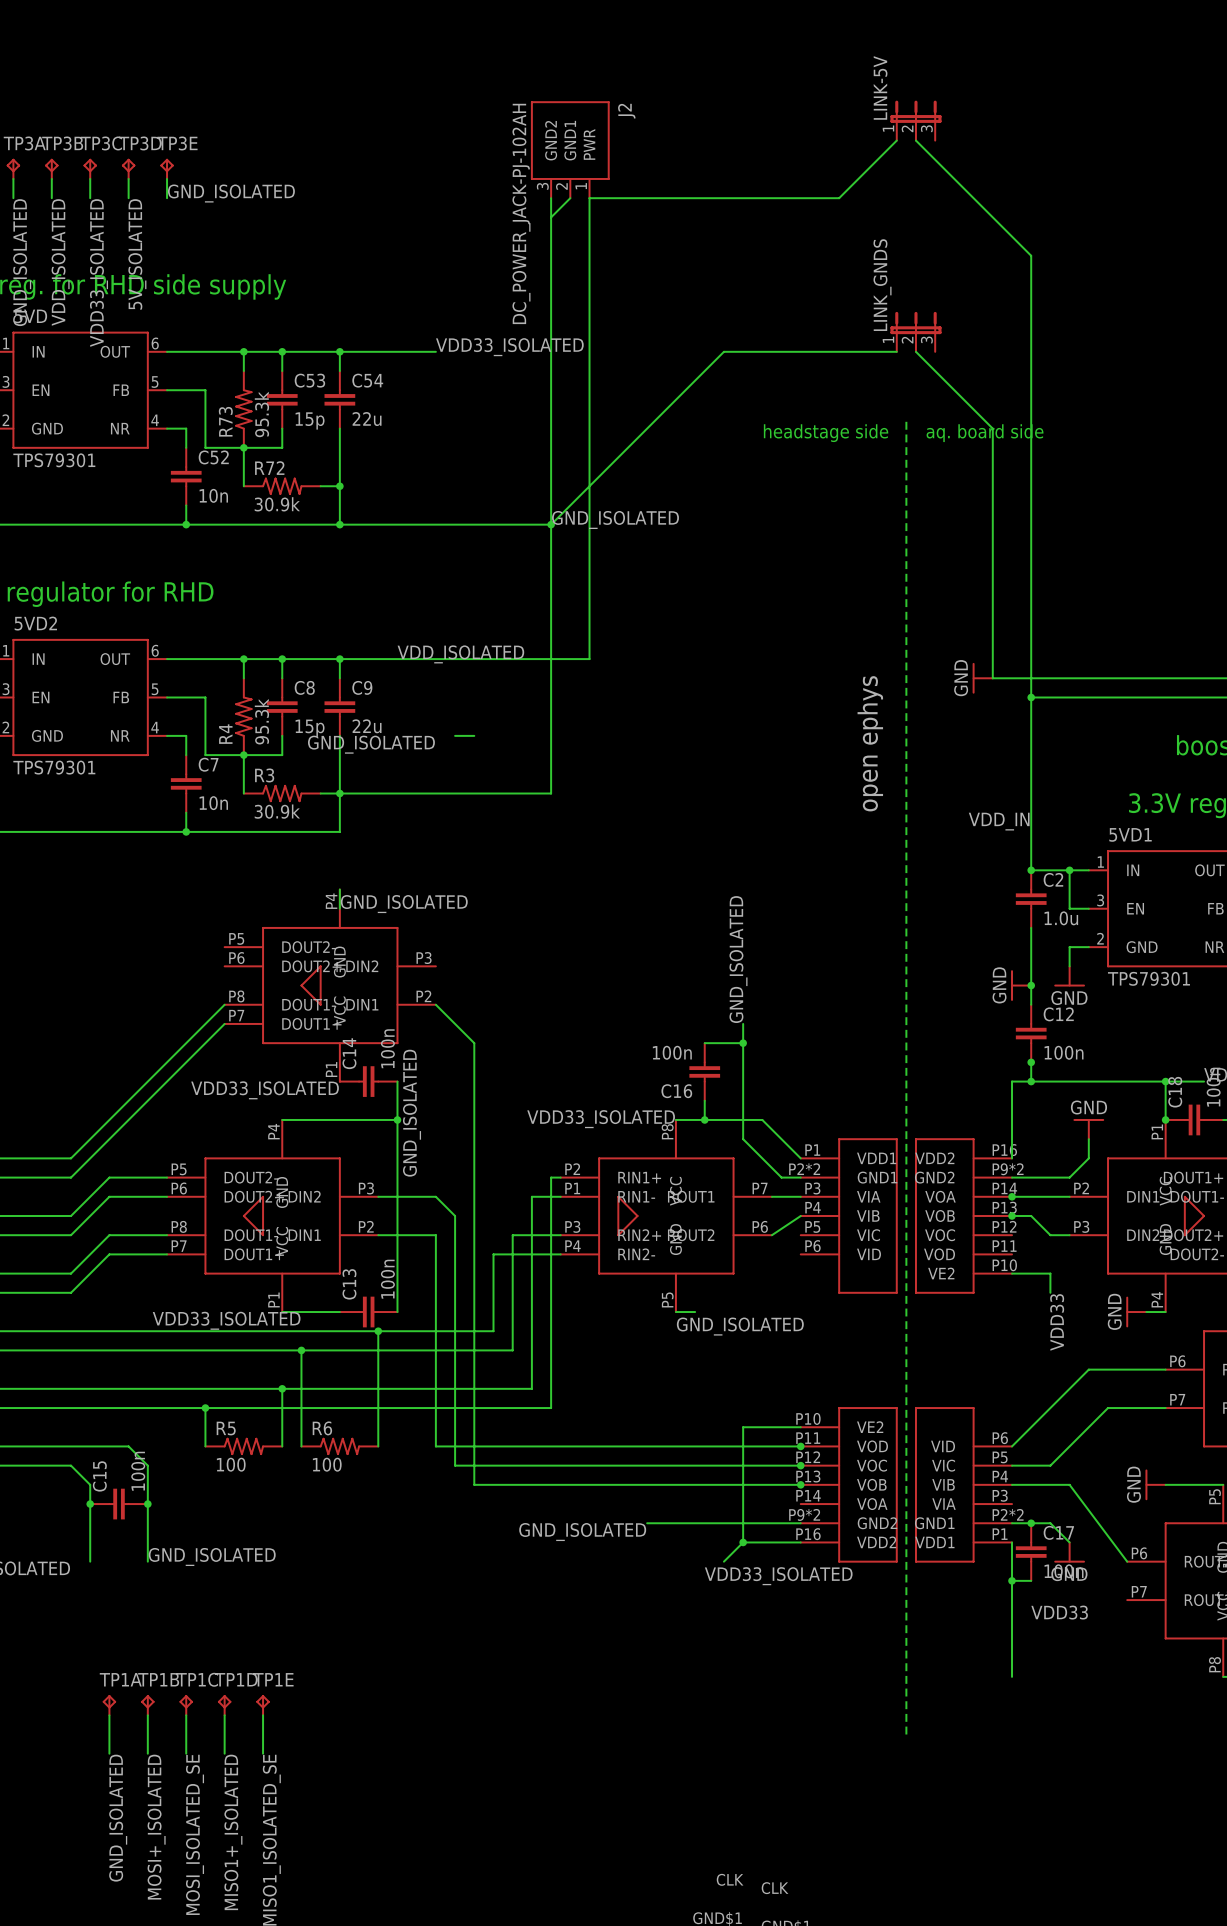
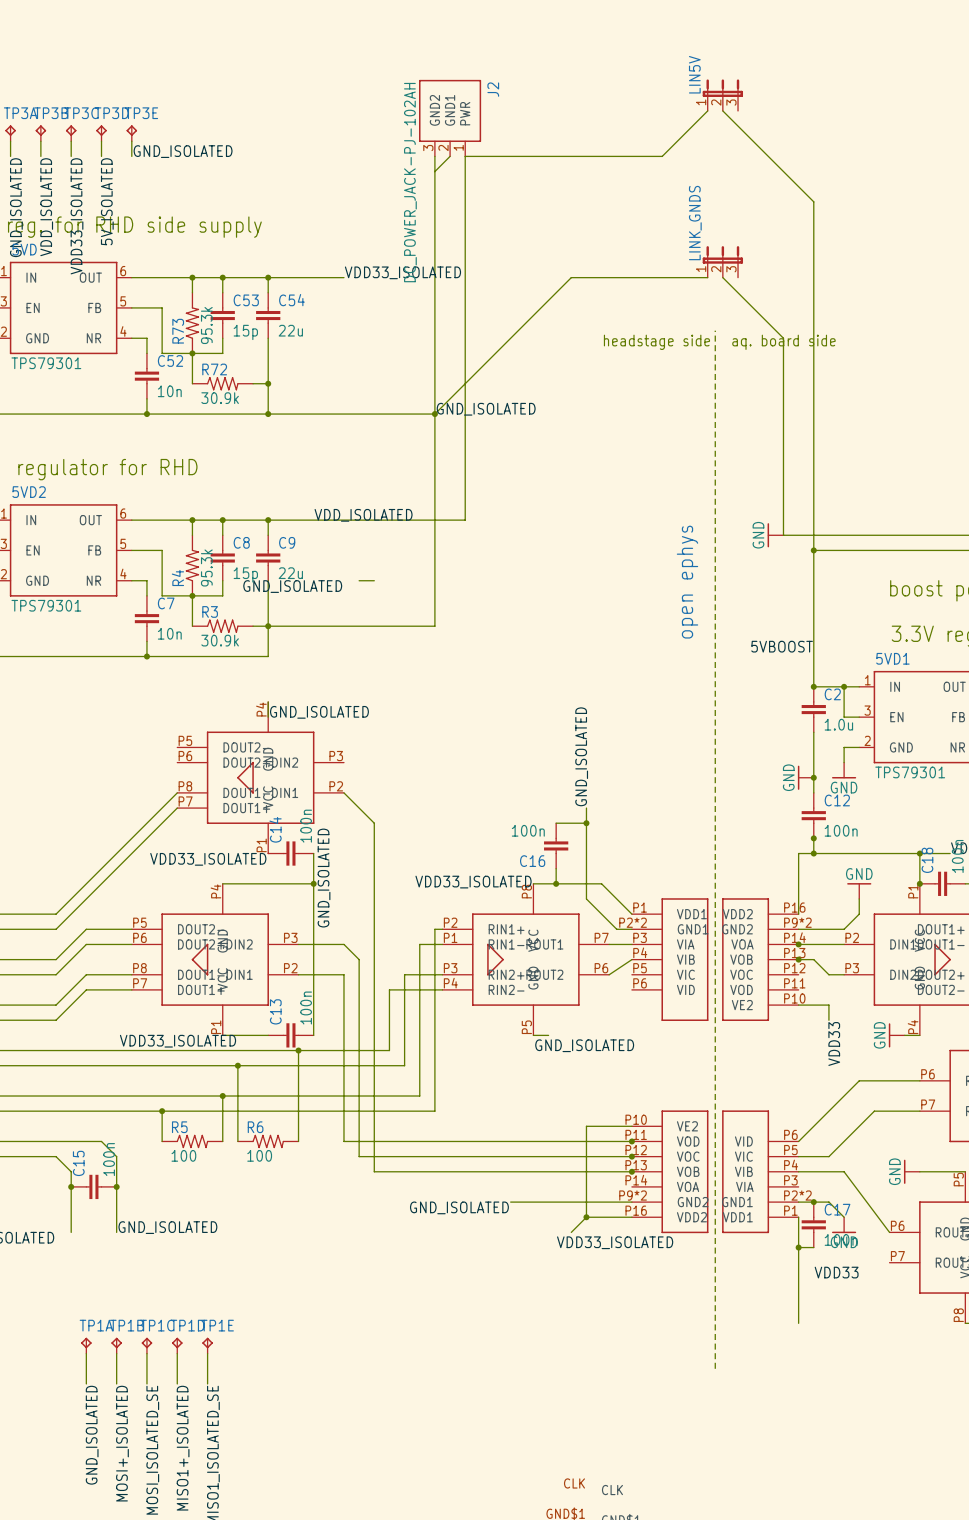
LINK-5V name: LINK-5V (880, 87) -> LIN5V (694, 74)
label: VDD_IN (999, 821) -> 5VBOOST (782, 646)

